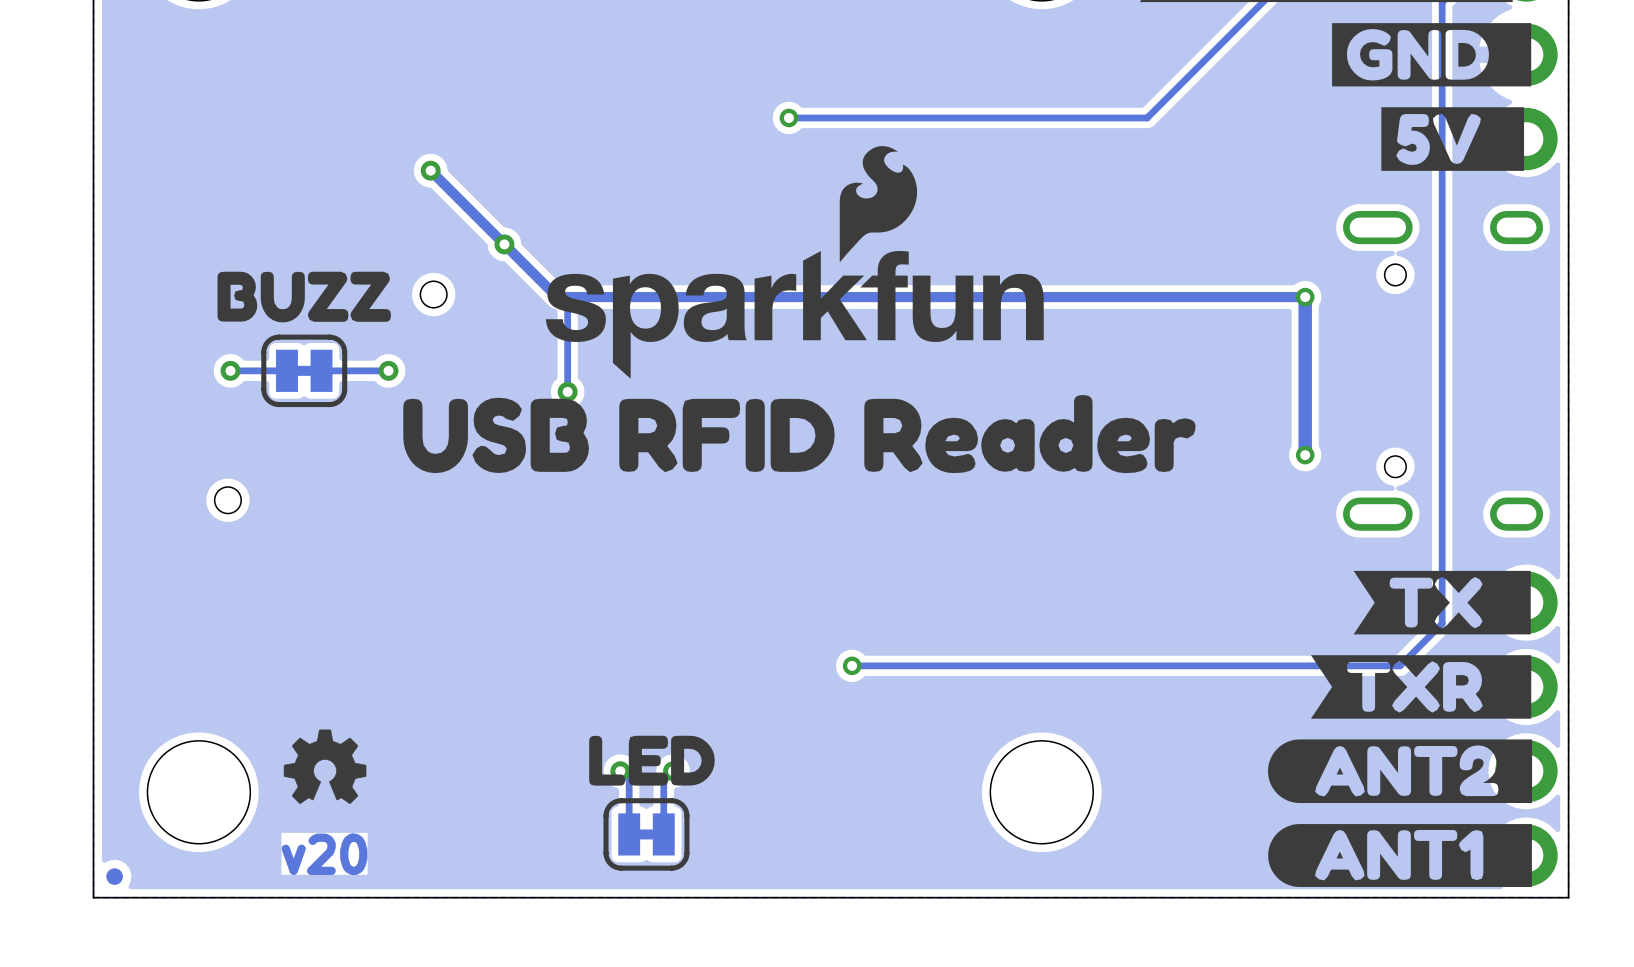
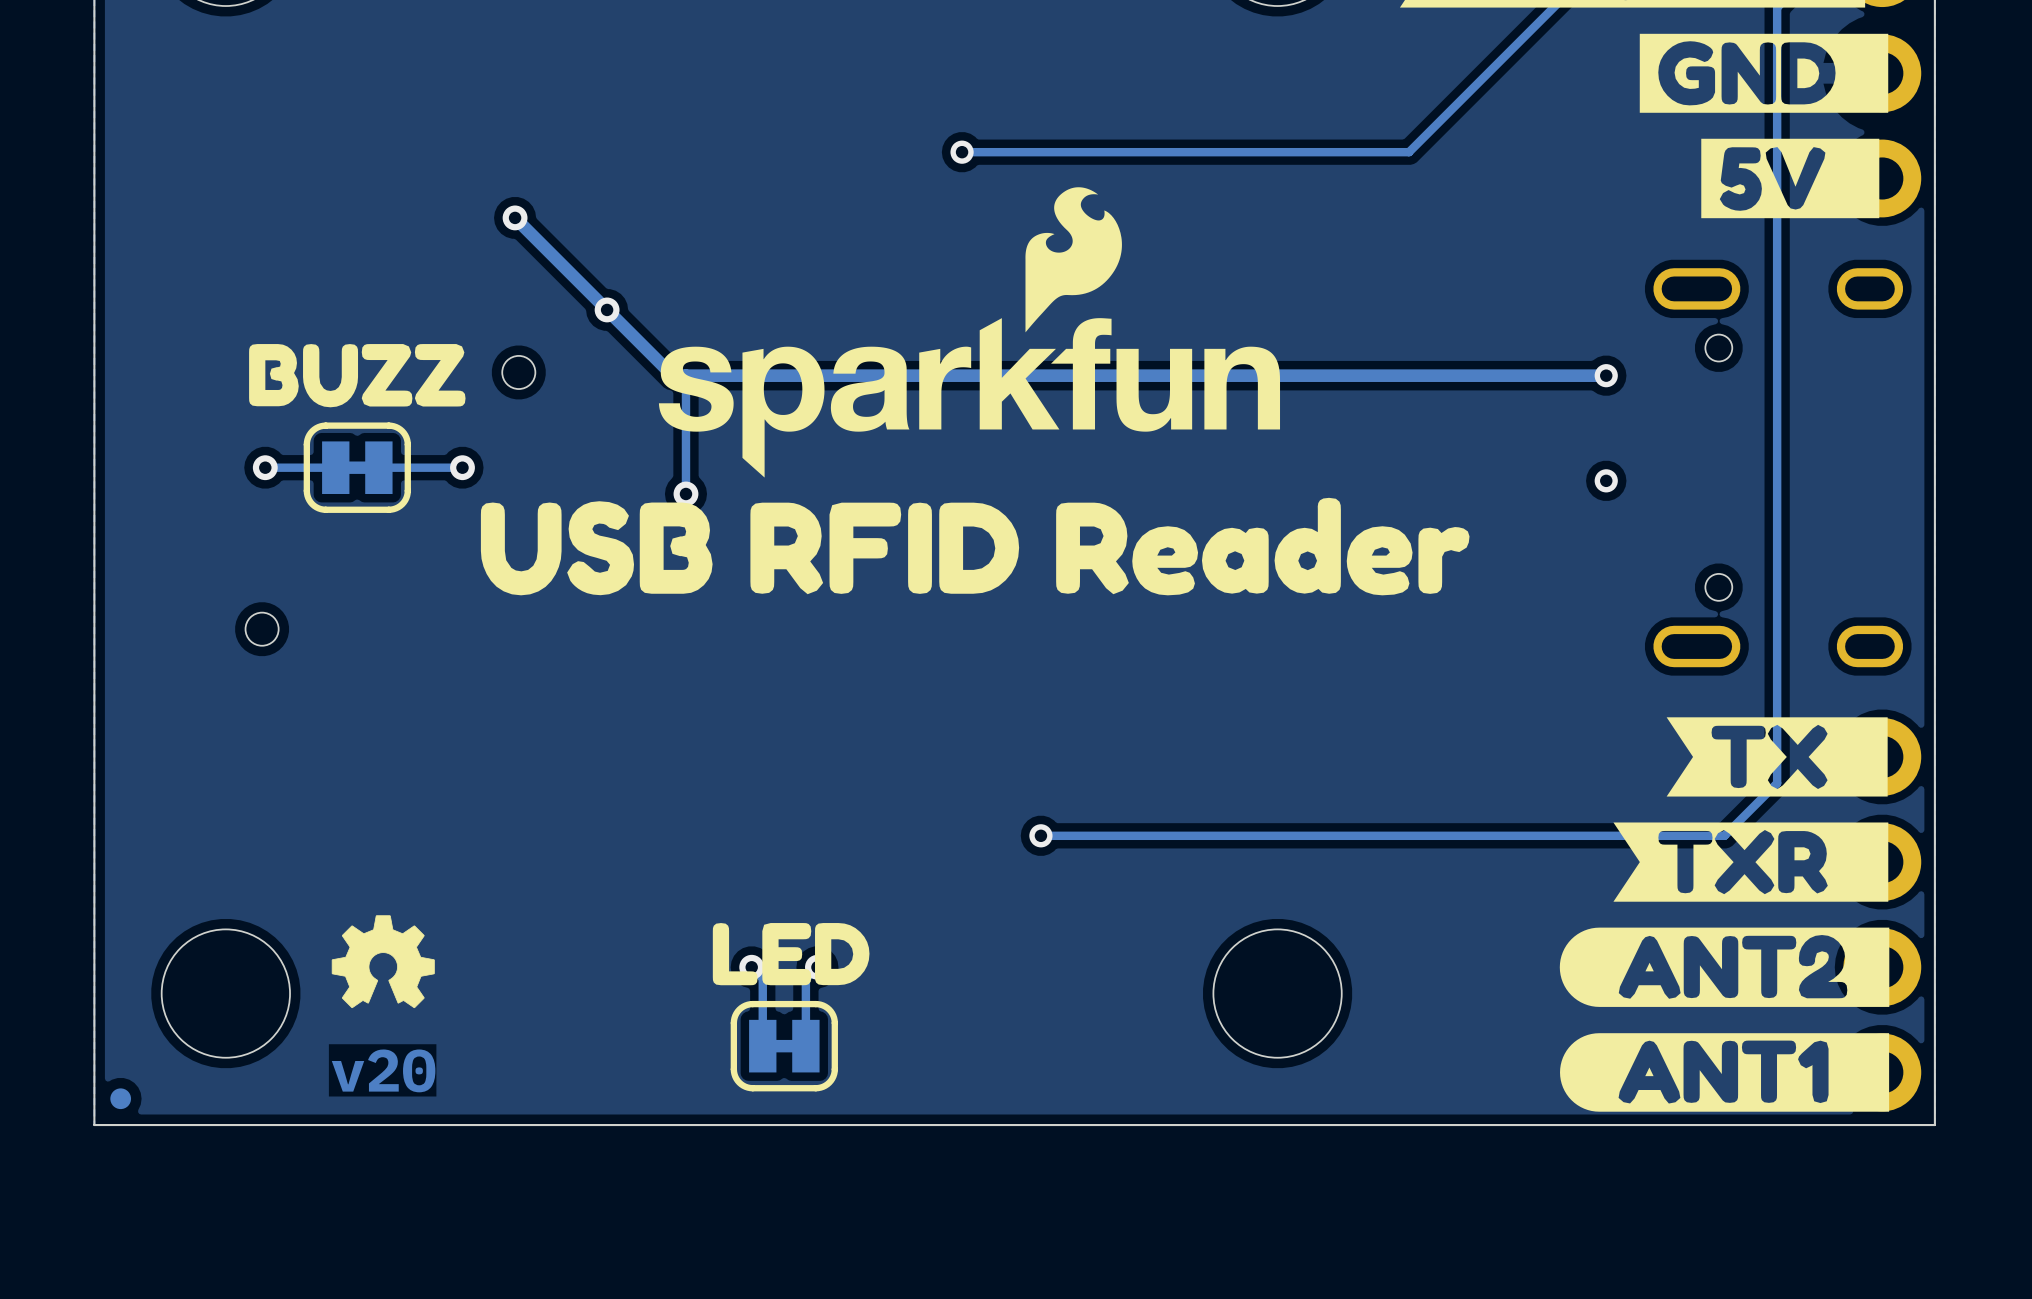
track: (1305, 297) (1305, 455) -> none
via position: (1305, 455) -> (1606, 480)

